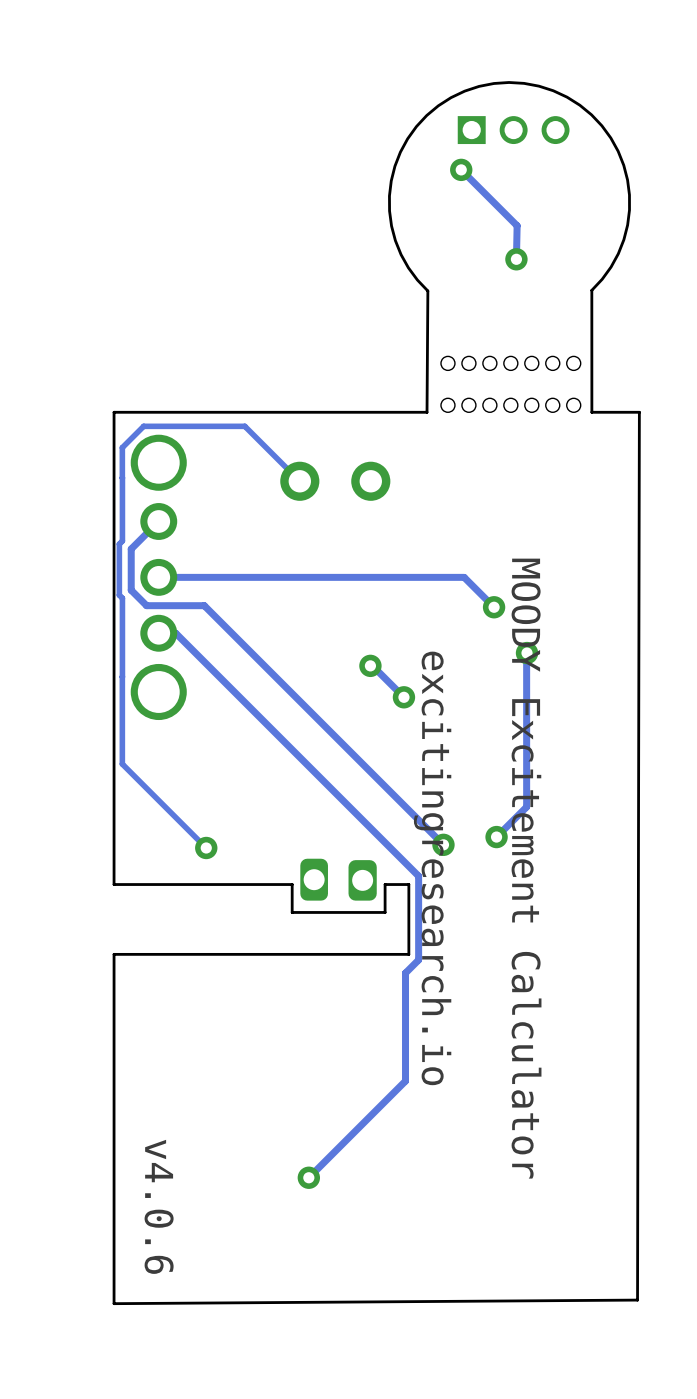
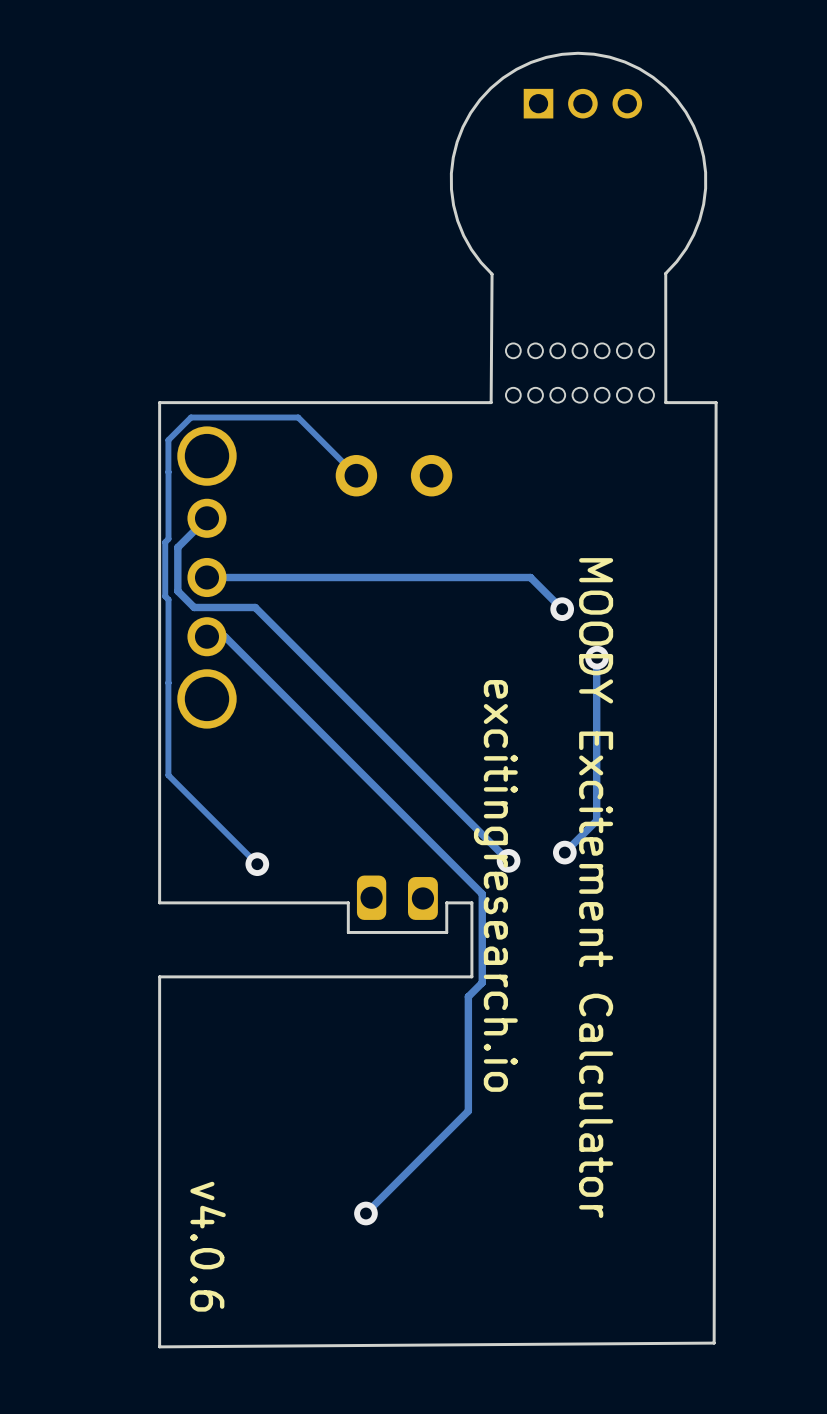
track: (461, 169) (517, 225) (517, 258) -> none
via: (461, 169) -> none
via: (516, 259) -> none
track: (370, 665) (403, 697) -> none
via: (370, 665) -> none
via: (403, 697) -> none

